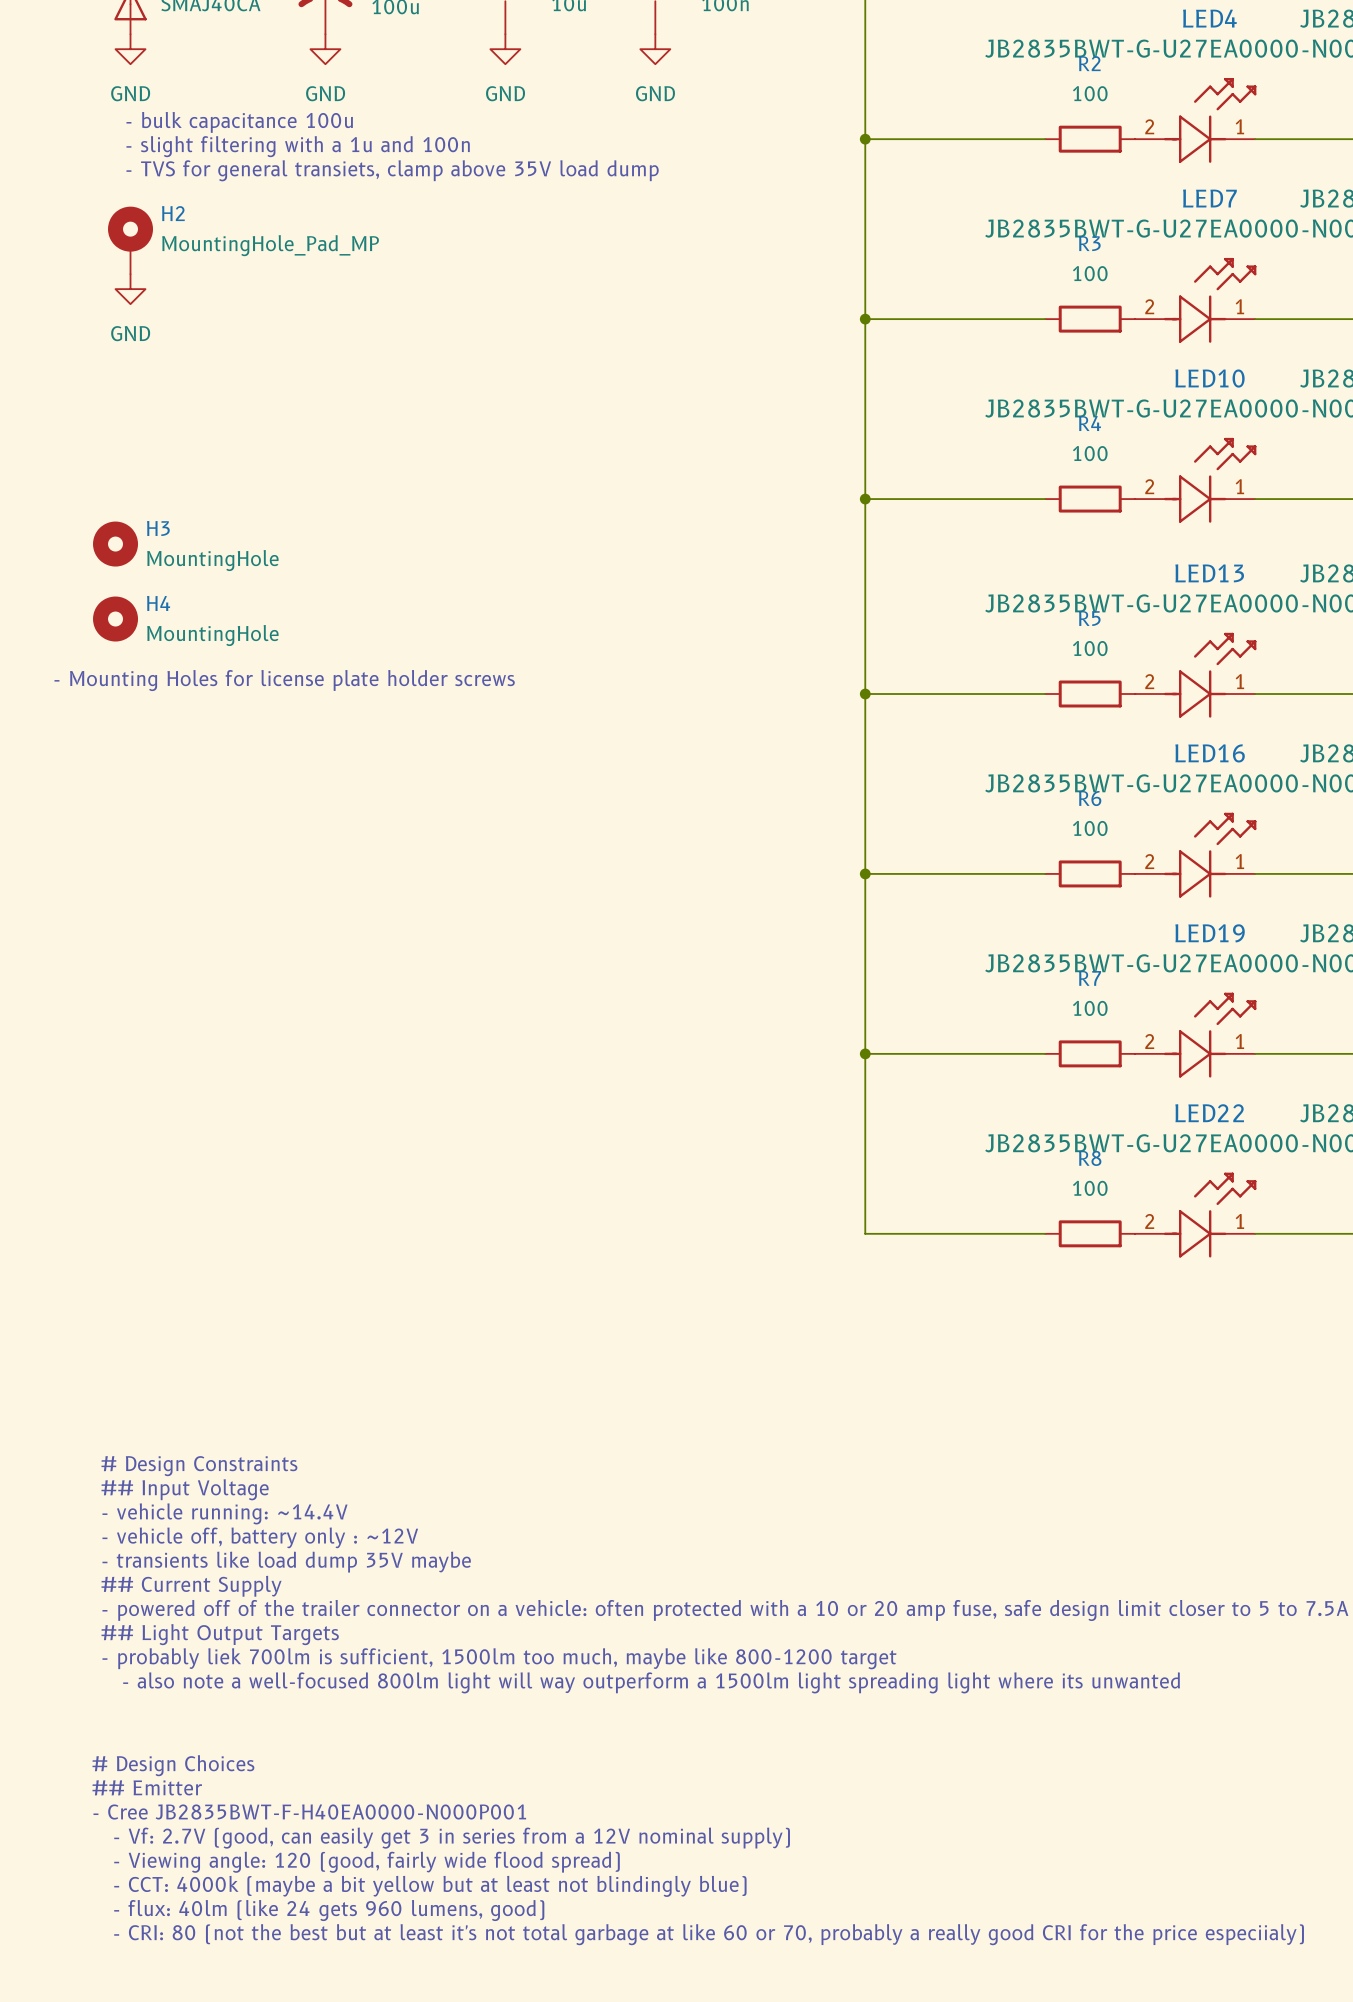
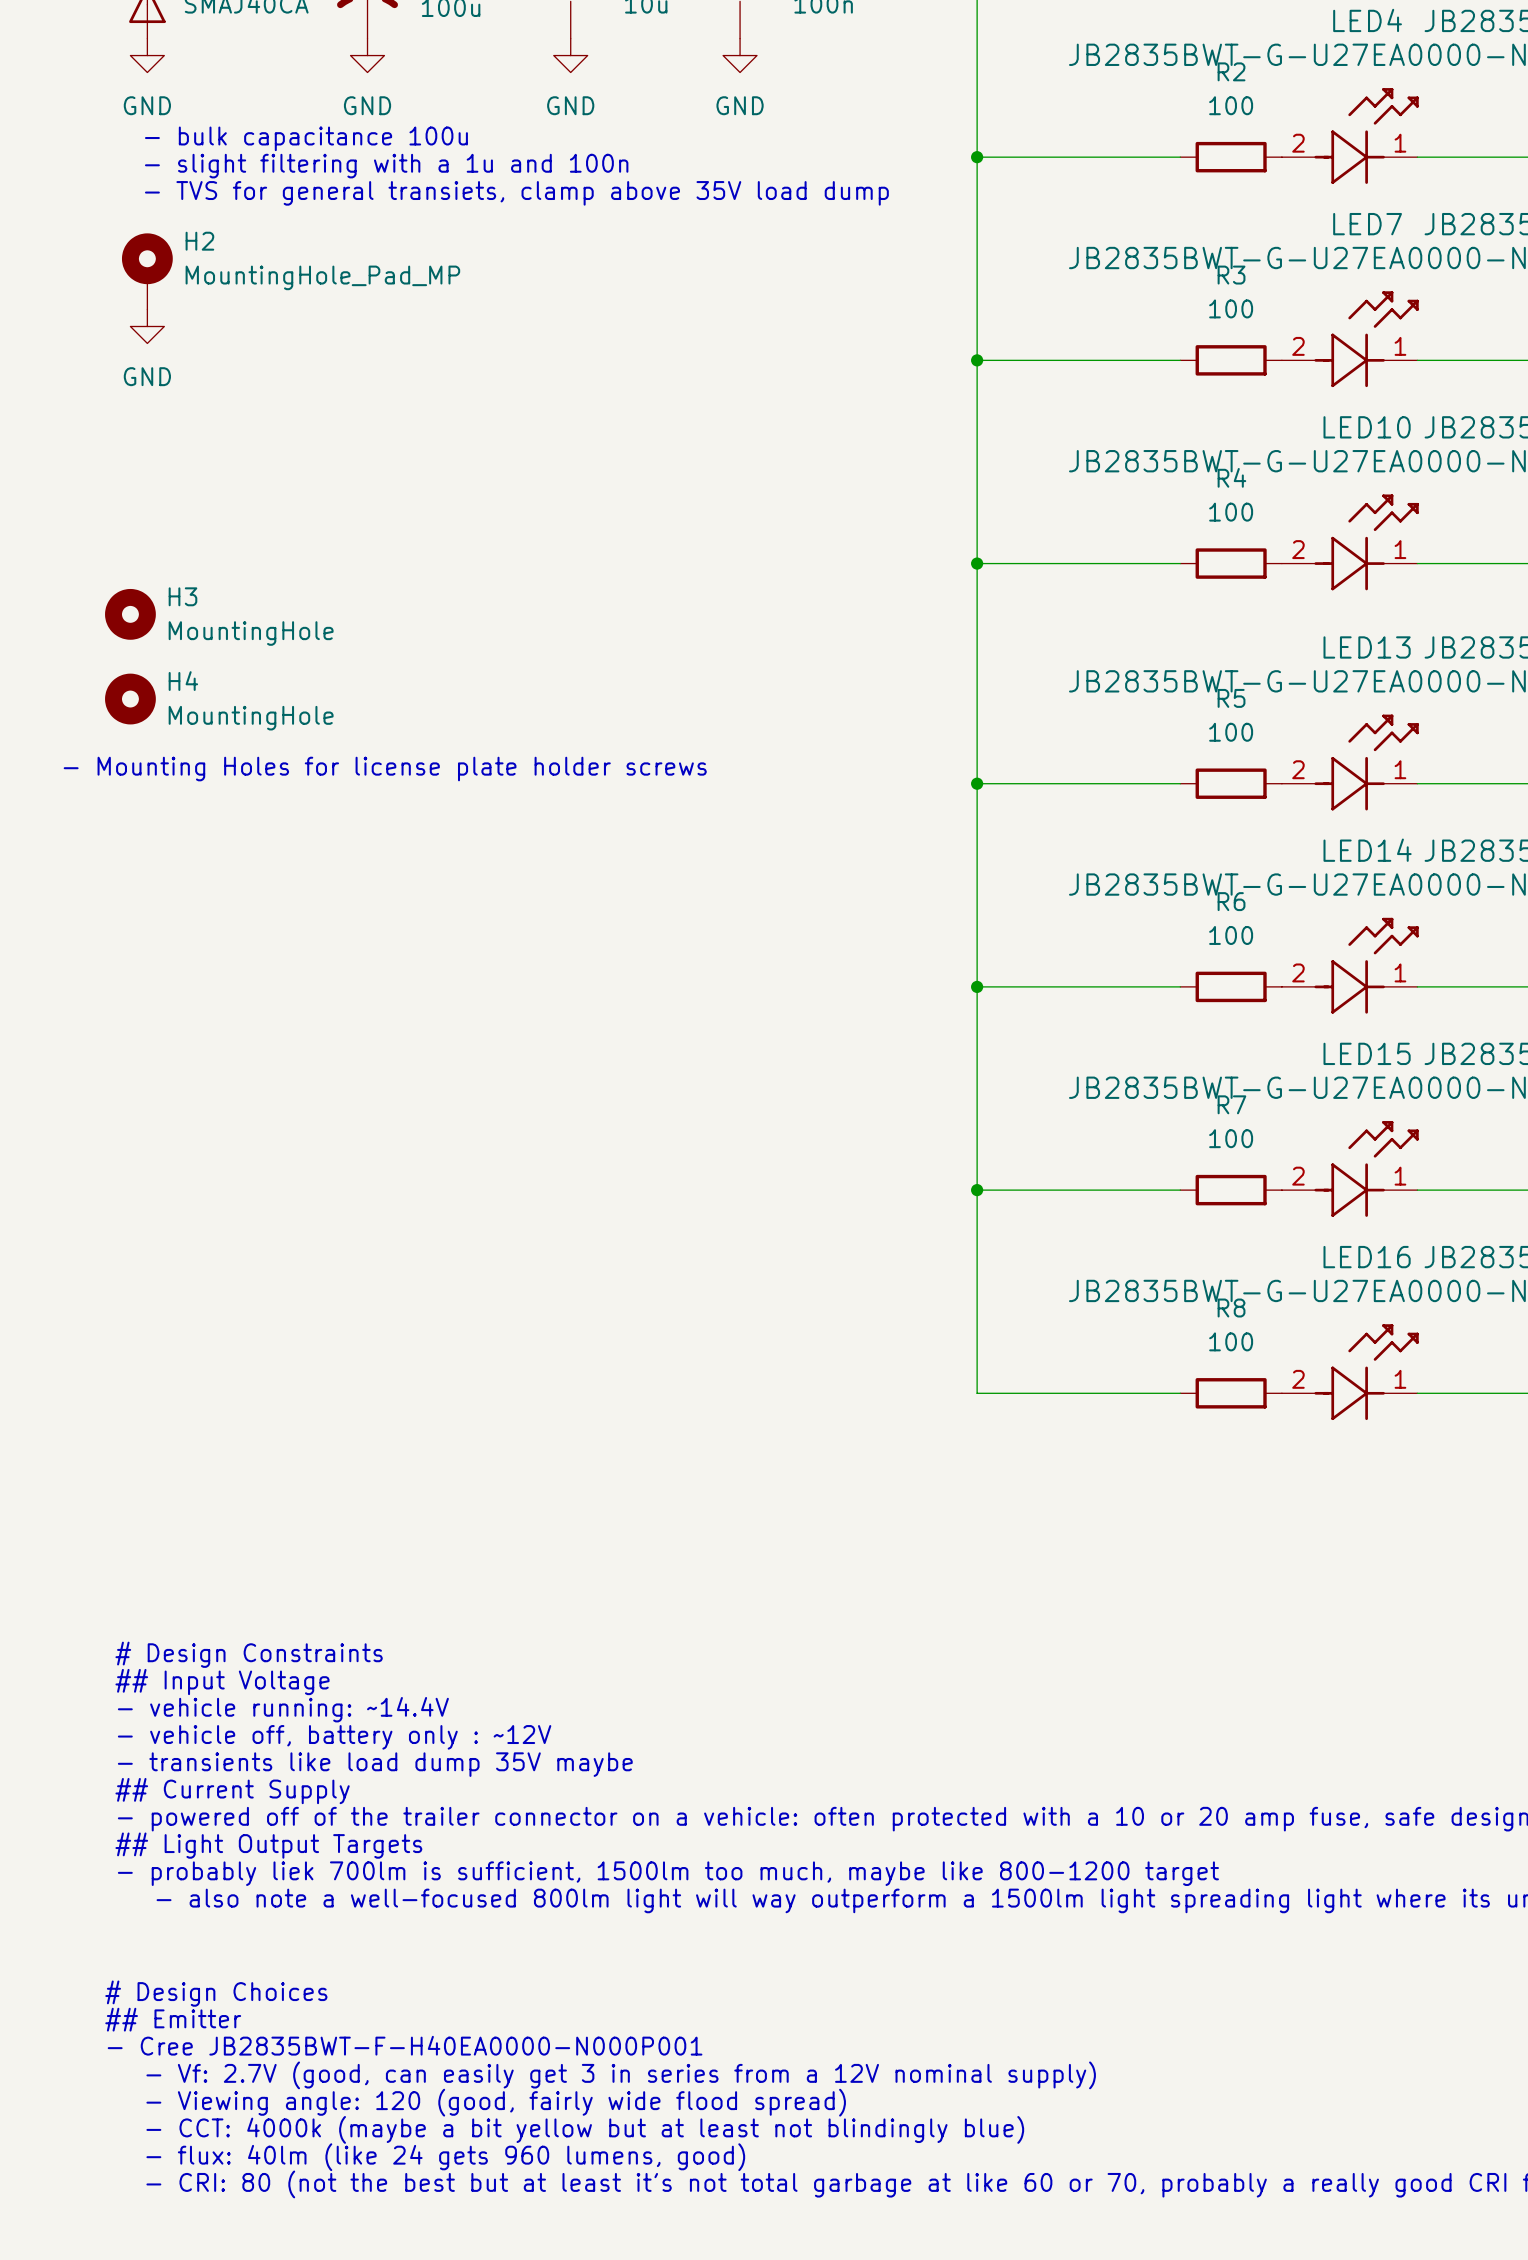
LED16 name: LED16 (1210, 753) -> LED14 (1367, 850)
LED19 name: LED19 (1210, 933) -> LED15 (1367, 1053)
LED22 name: LED22 (1209, 1113) -> LED16 (1367, 1257)

